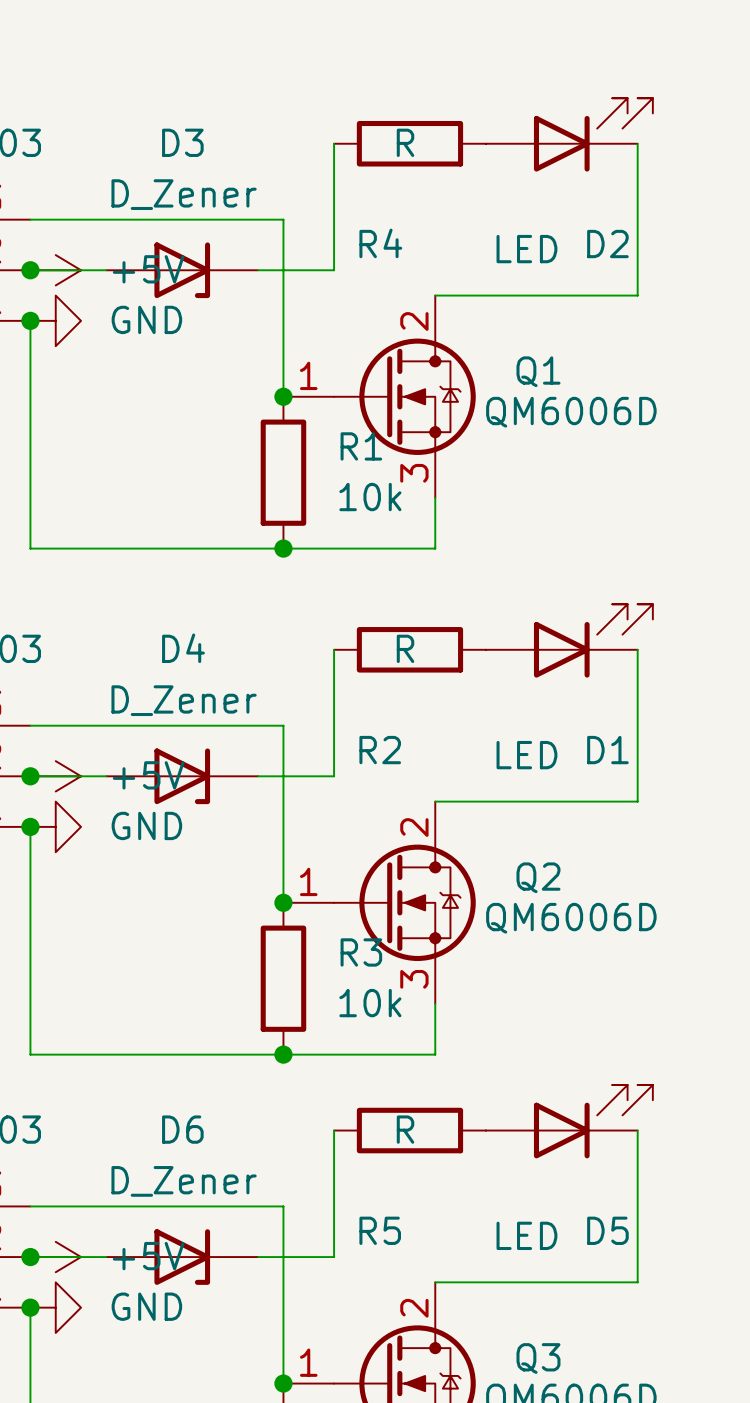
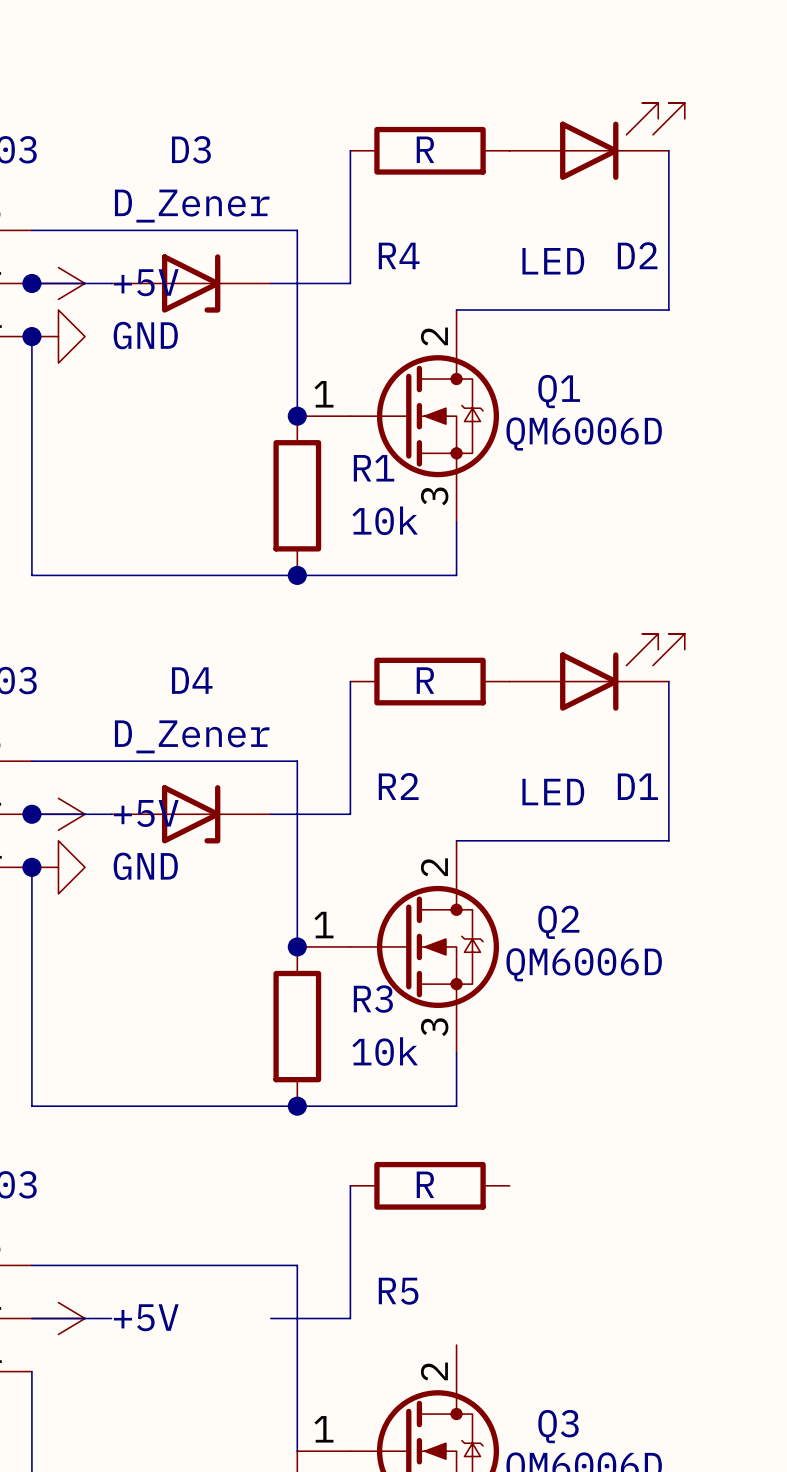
D5: LED (569, 1121) -> none
wire: (637, 1130) (637, 1282) (435, 1282) -> none
junction: (30, 1257) -> none
D6: D_Zener (182, 1257) -> none
junction: (30, 1307) -> none
power symbol: GND (55, 1307) -> none
junction: (283, 1383) -> none

